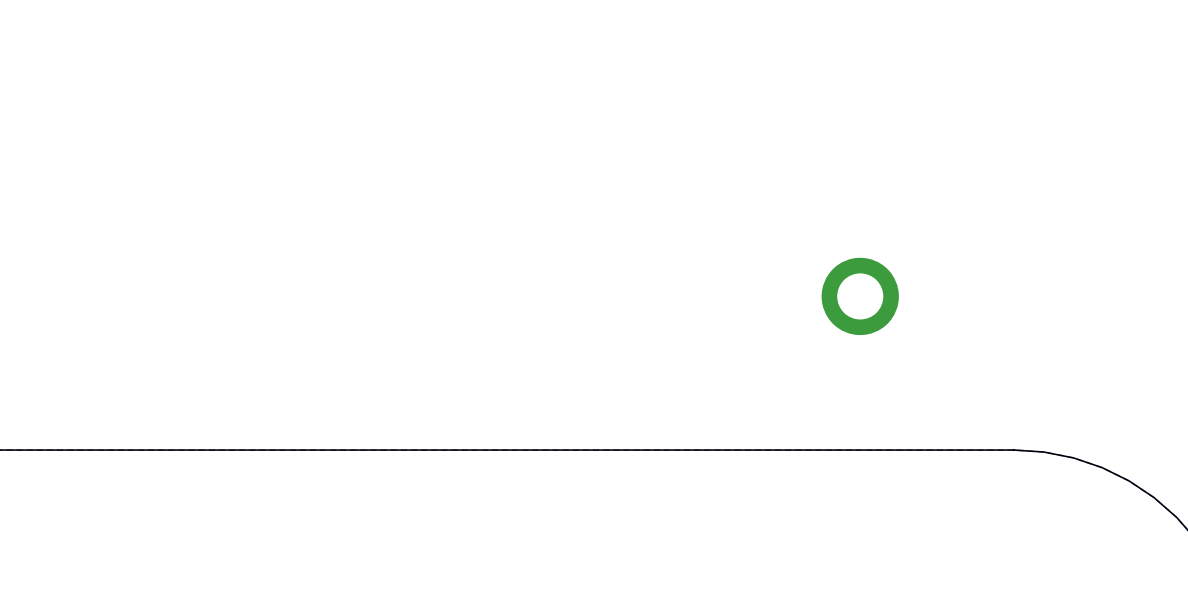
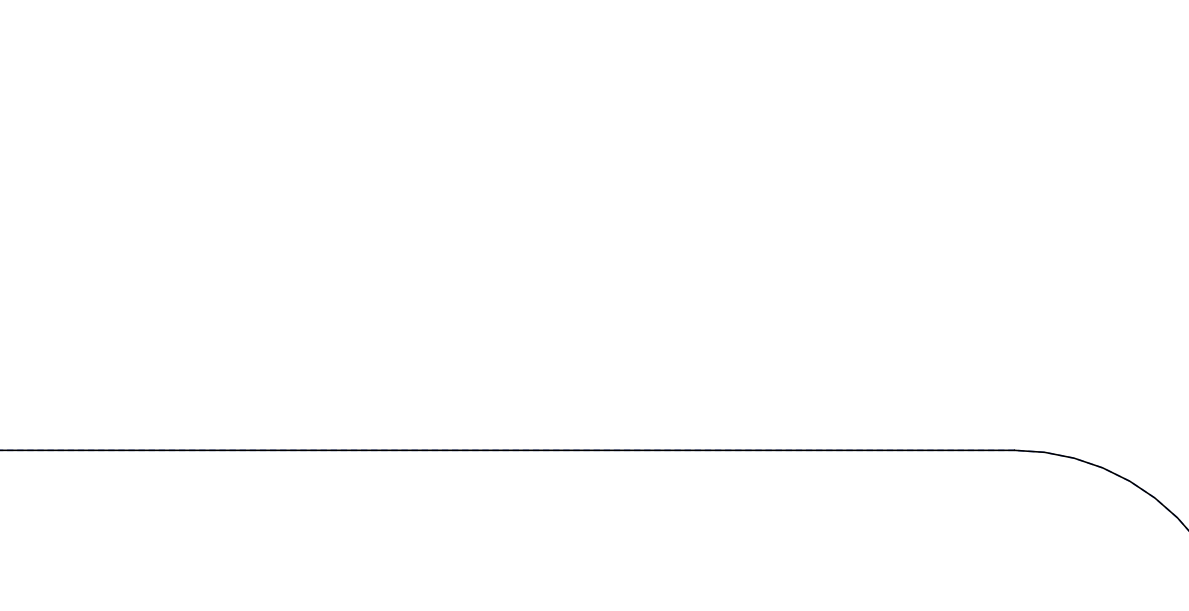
via: (860, 296) -> none

